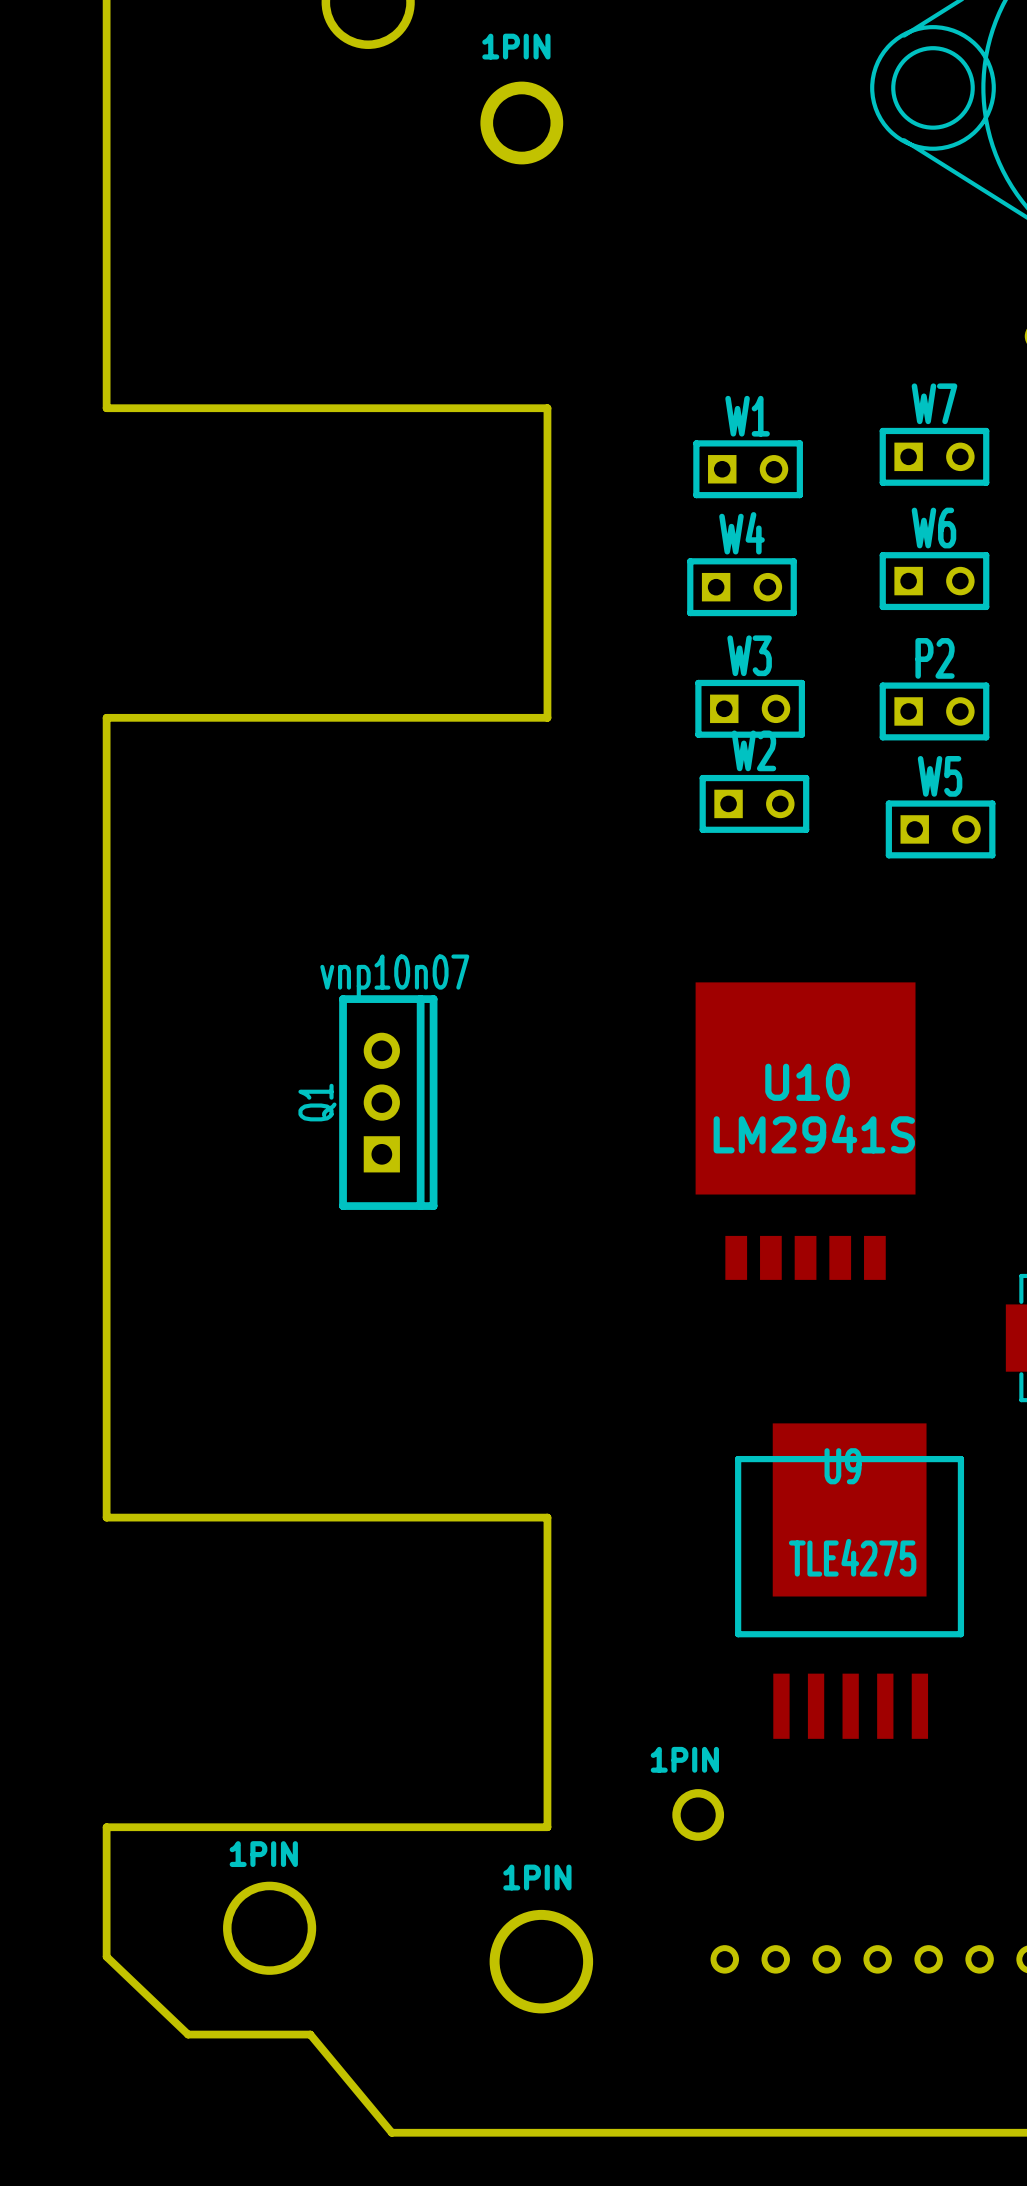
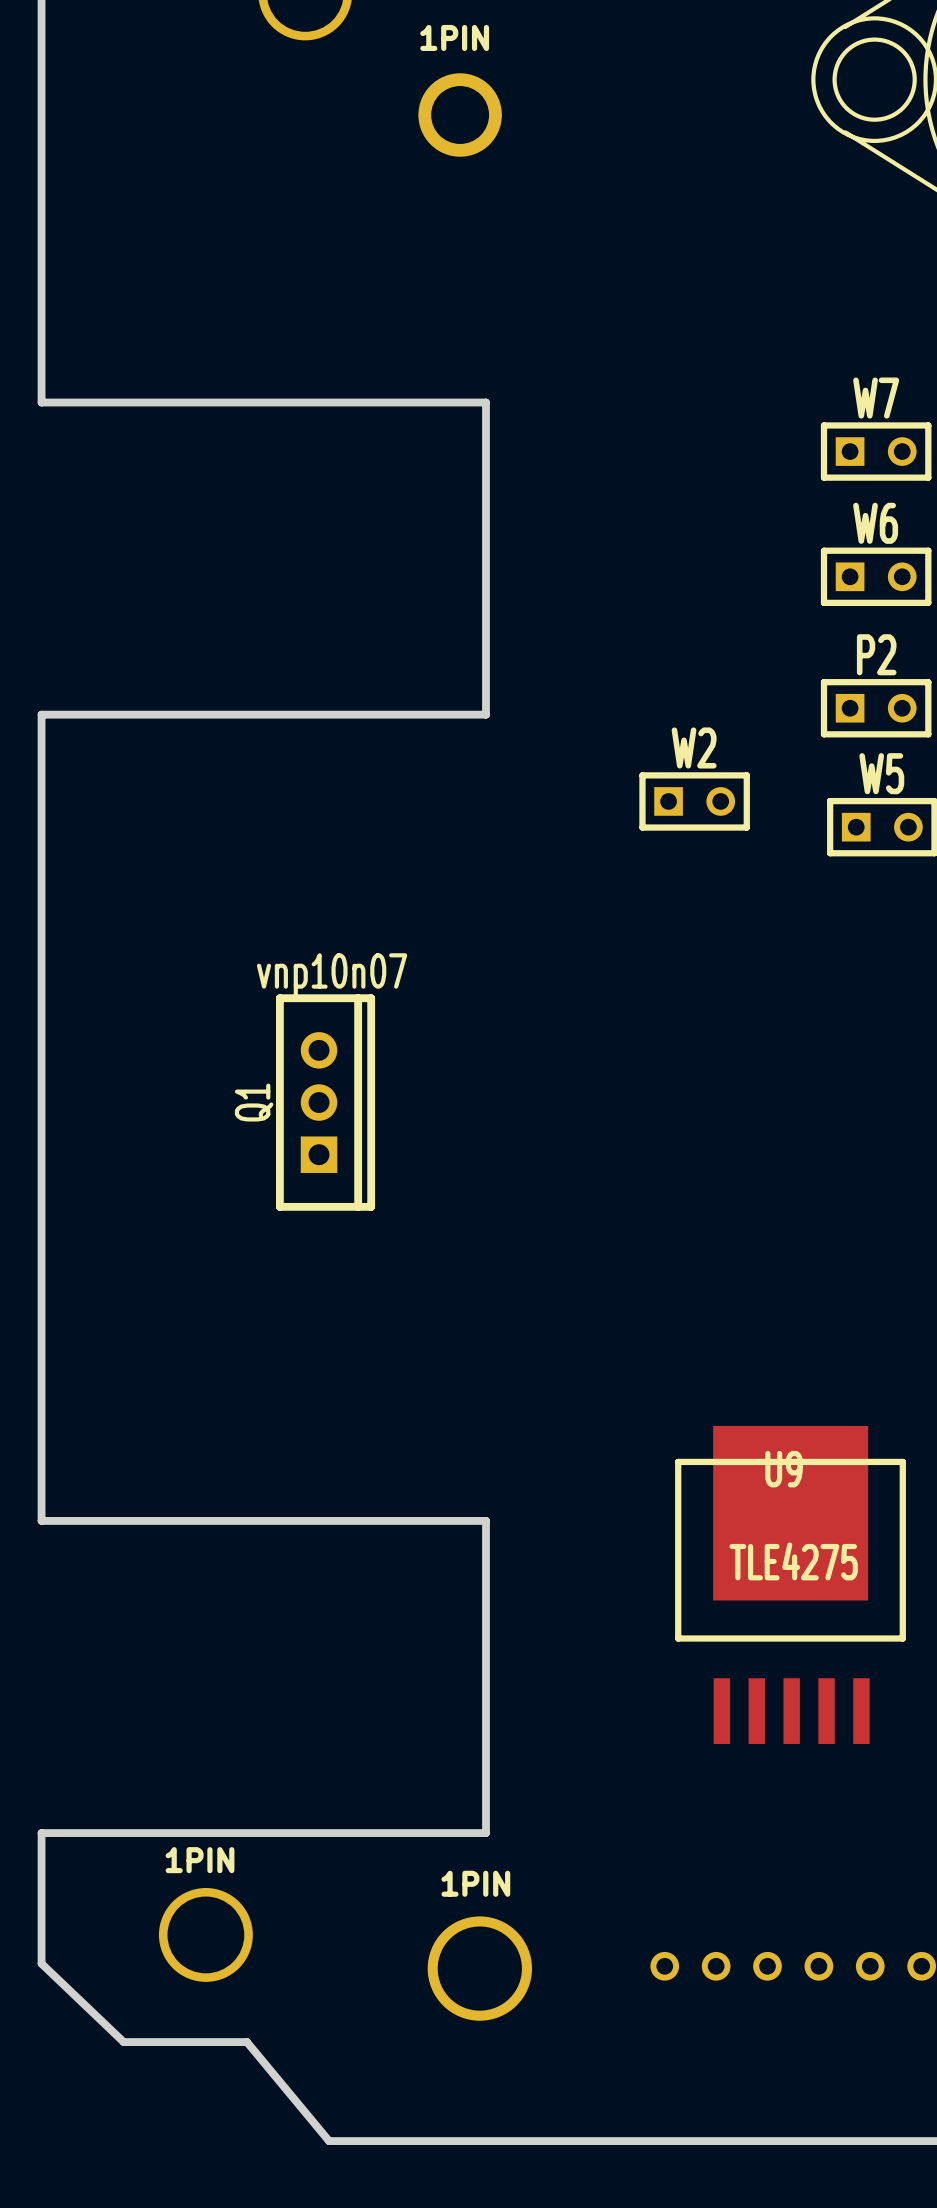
W1: (748, 469) -> none
W4: (742, 587) -> none
W3: (750, 708) -> none
U10: LM2941S (805, 1131) -> none
1PIN: (698, 1814) -> none

